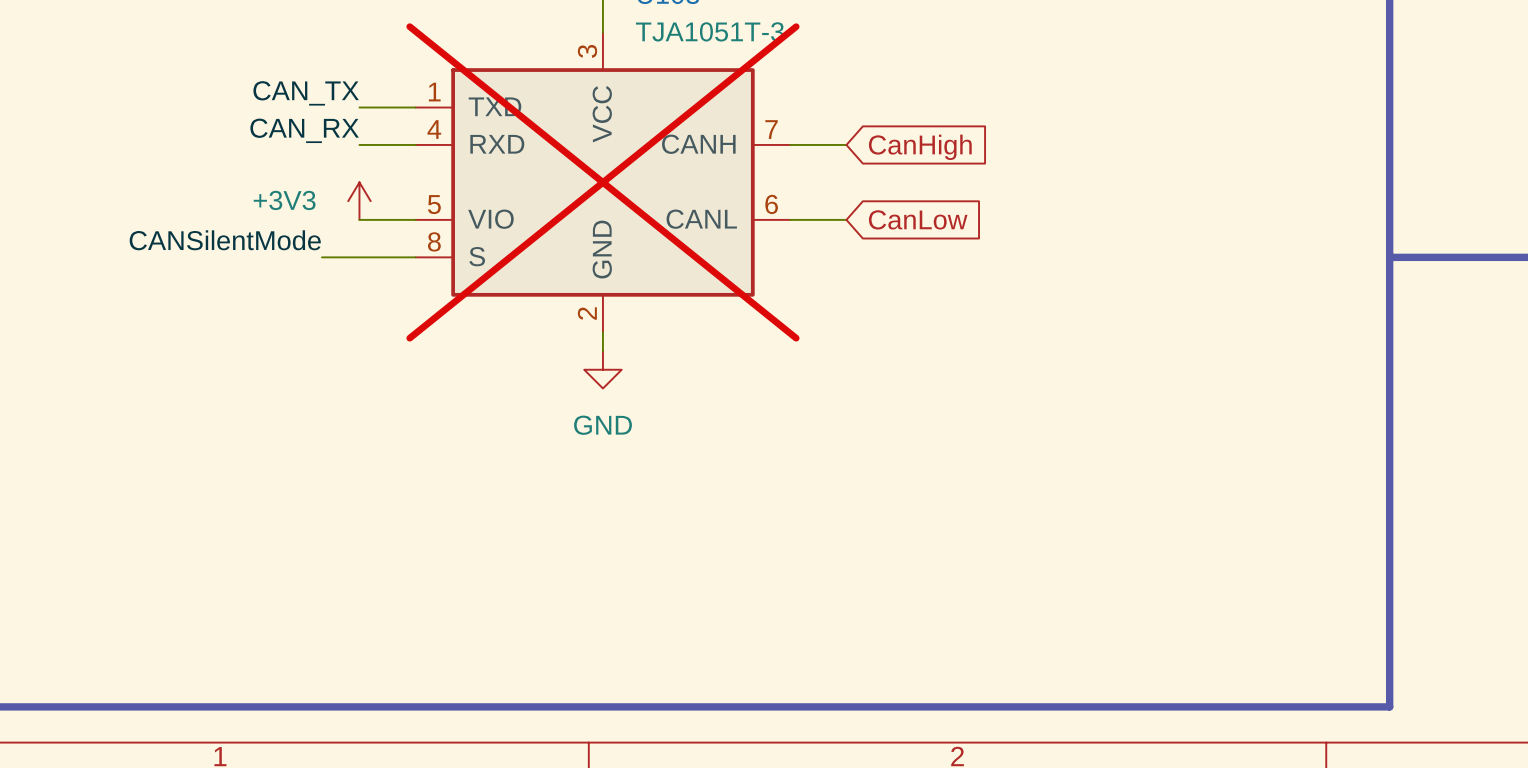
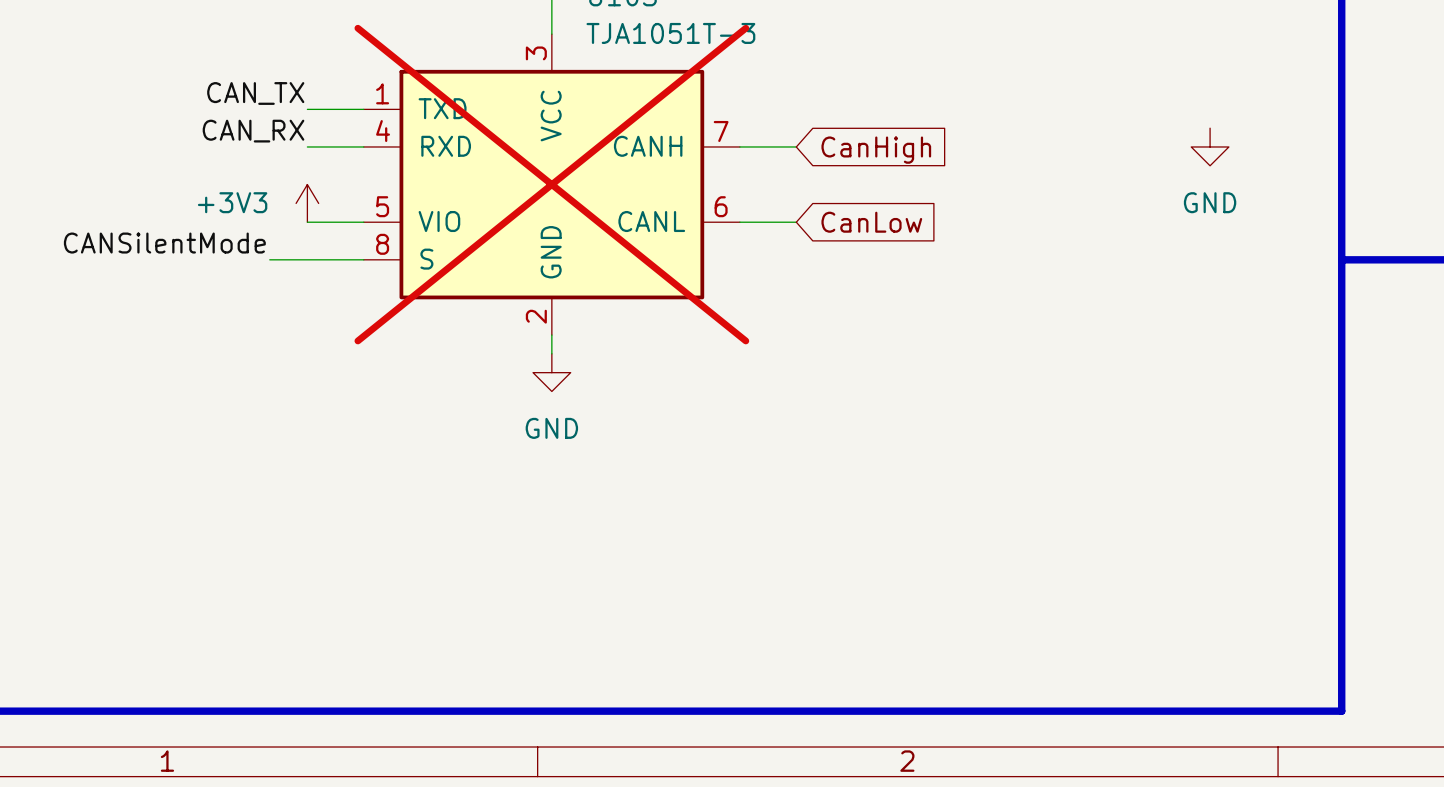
power symbol: none -> GND (1210, 146)

